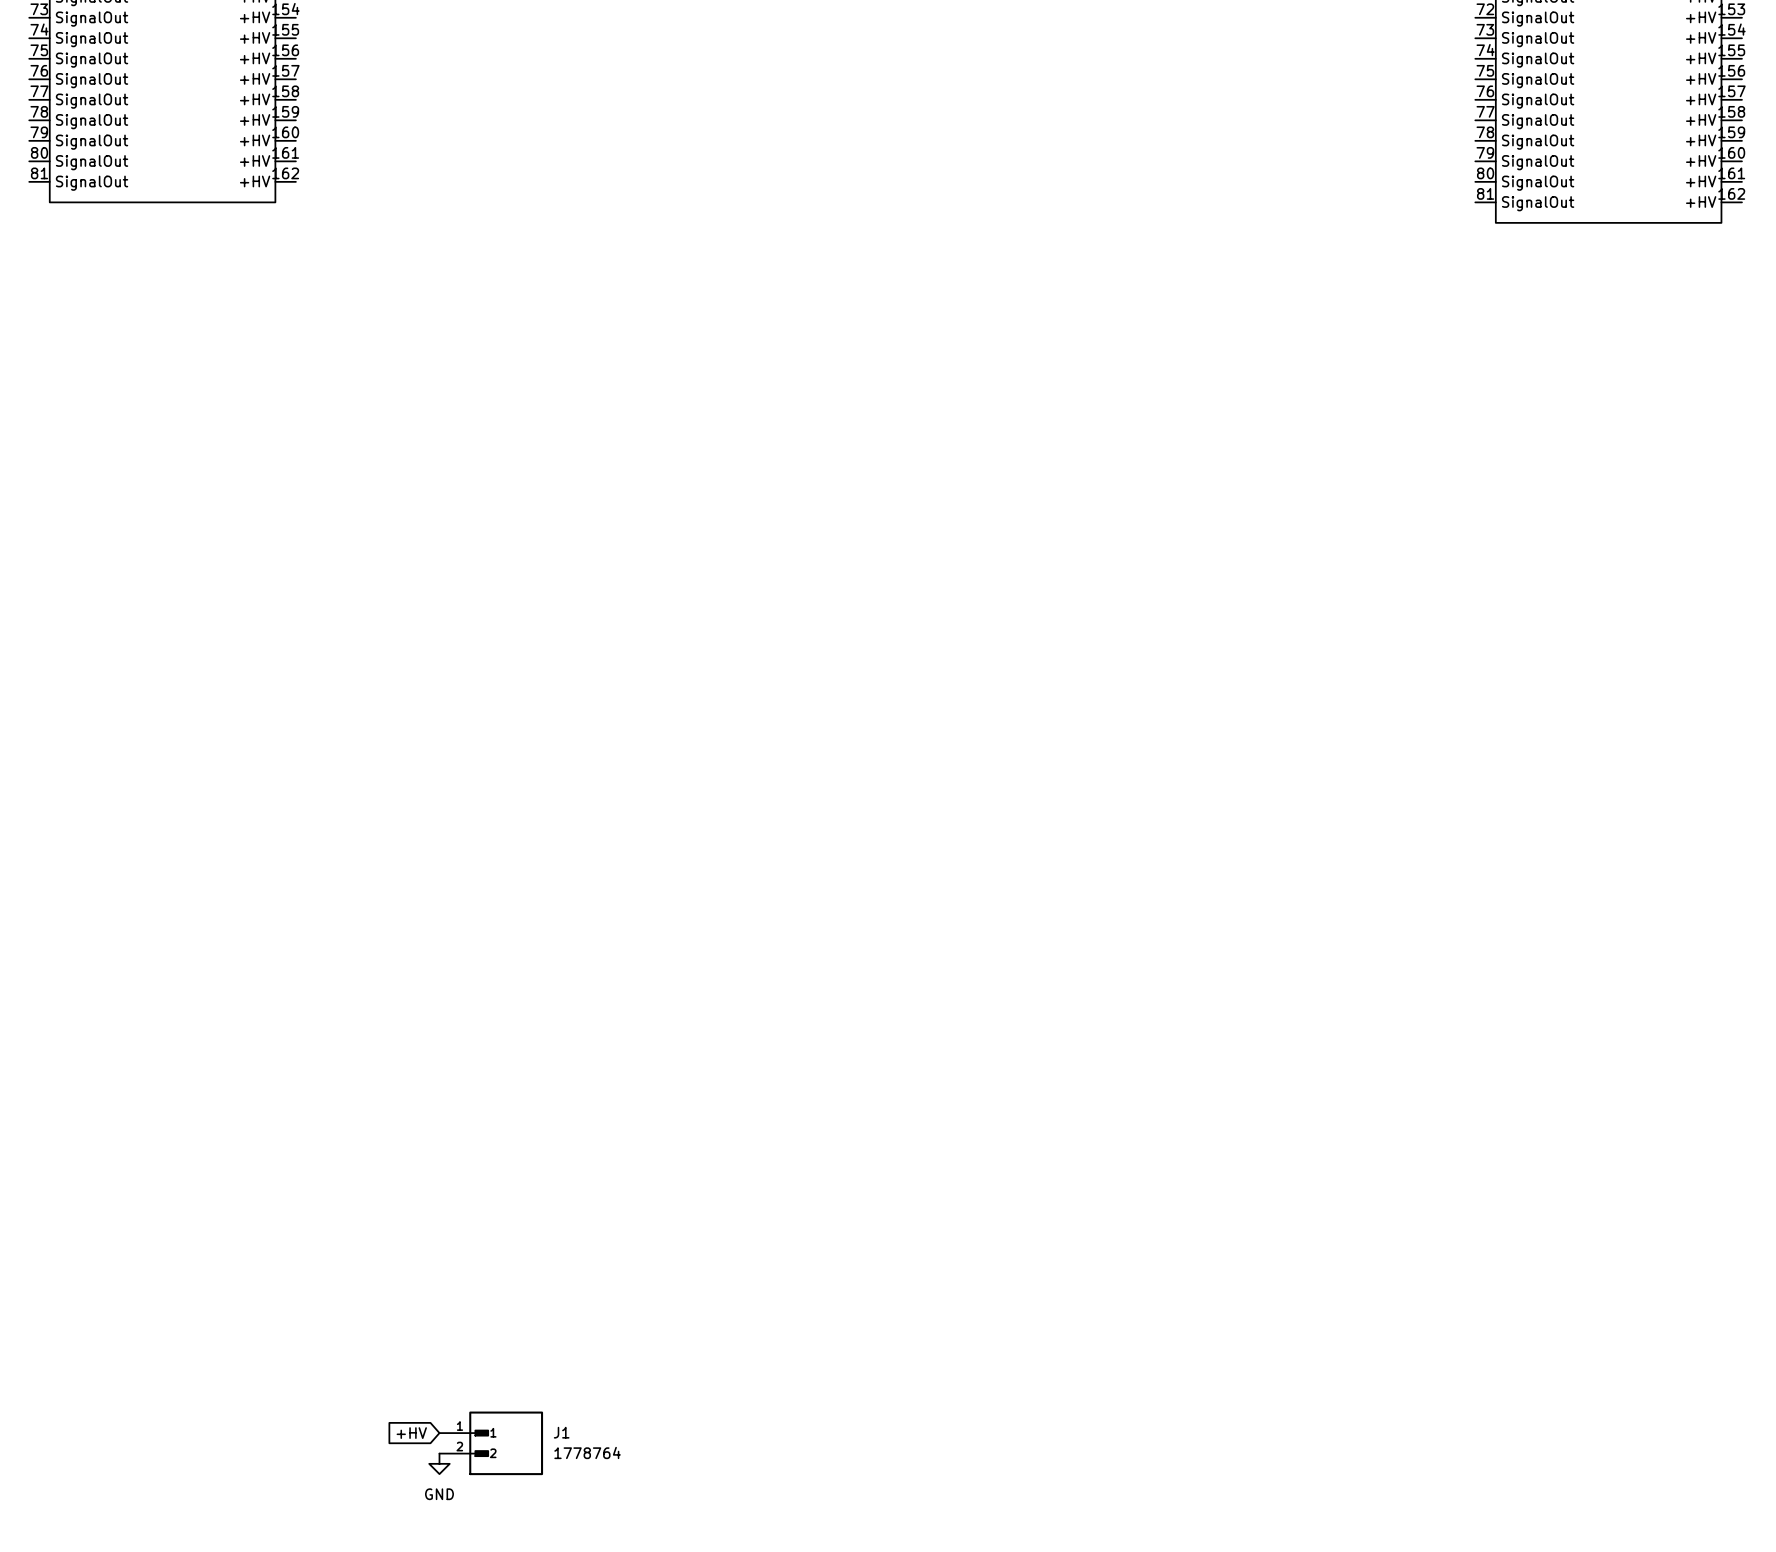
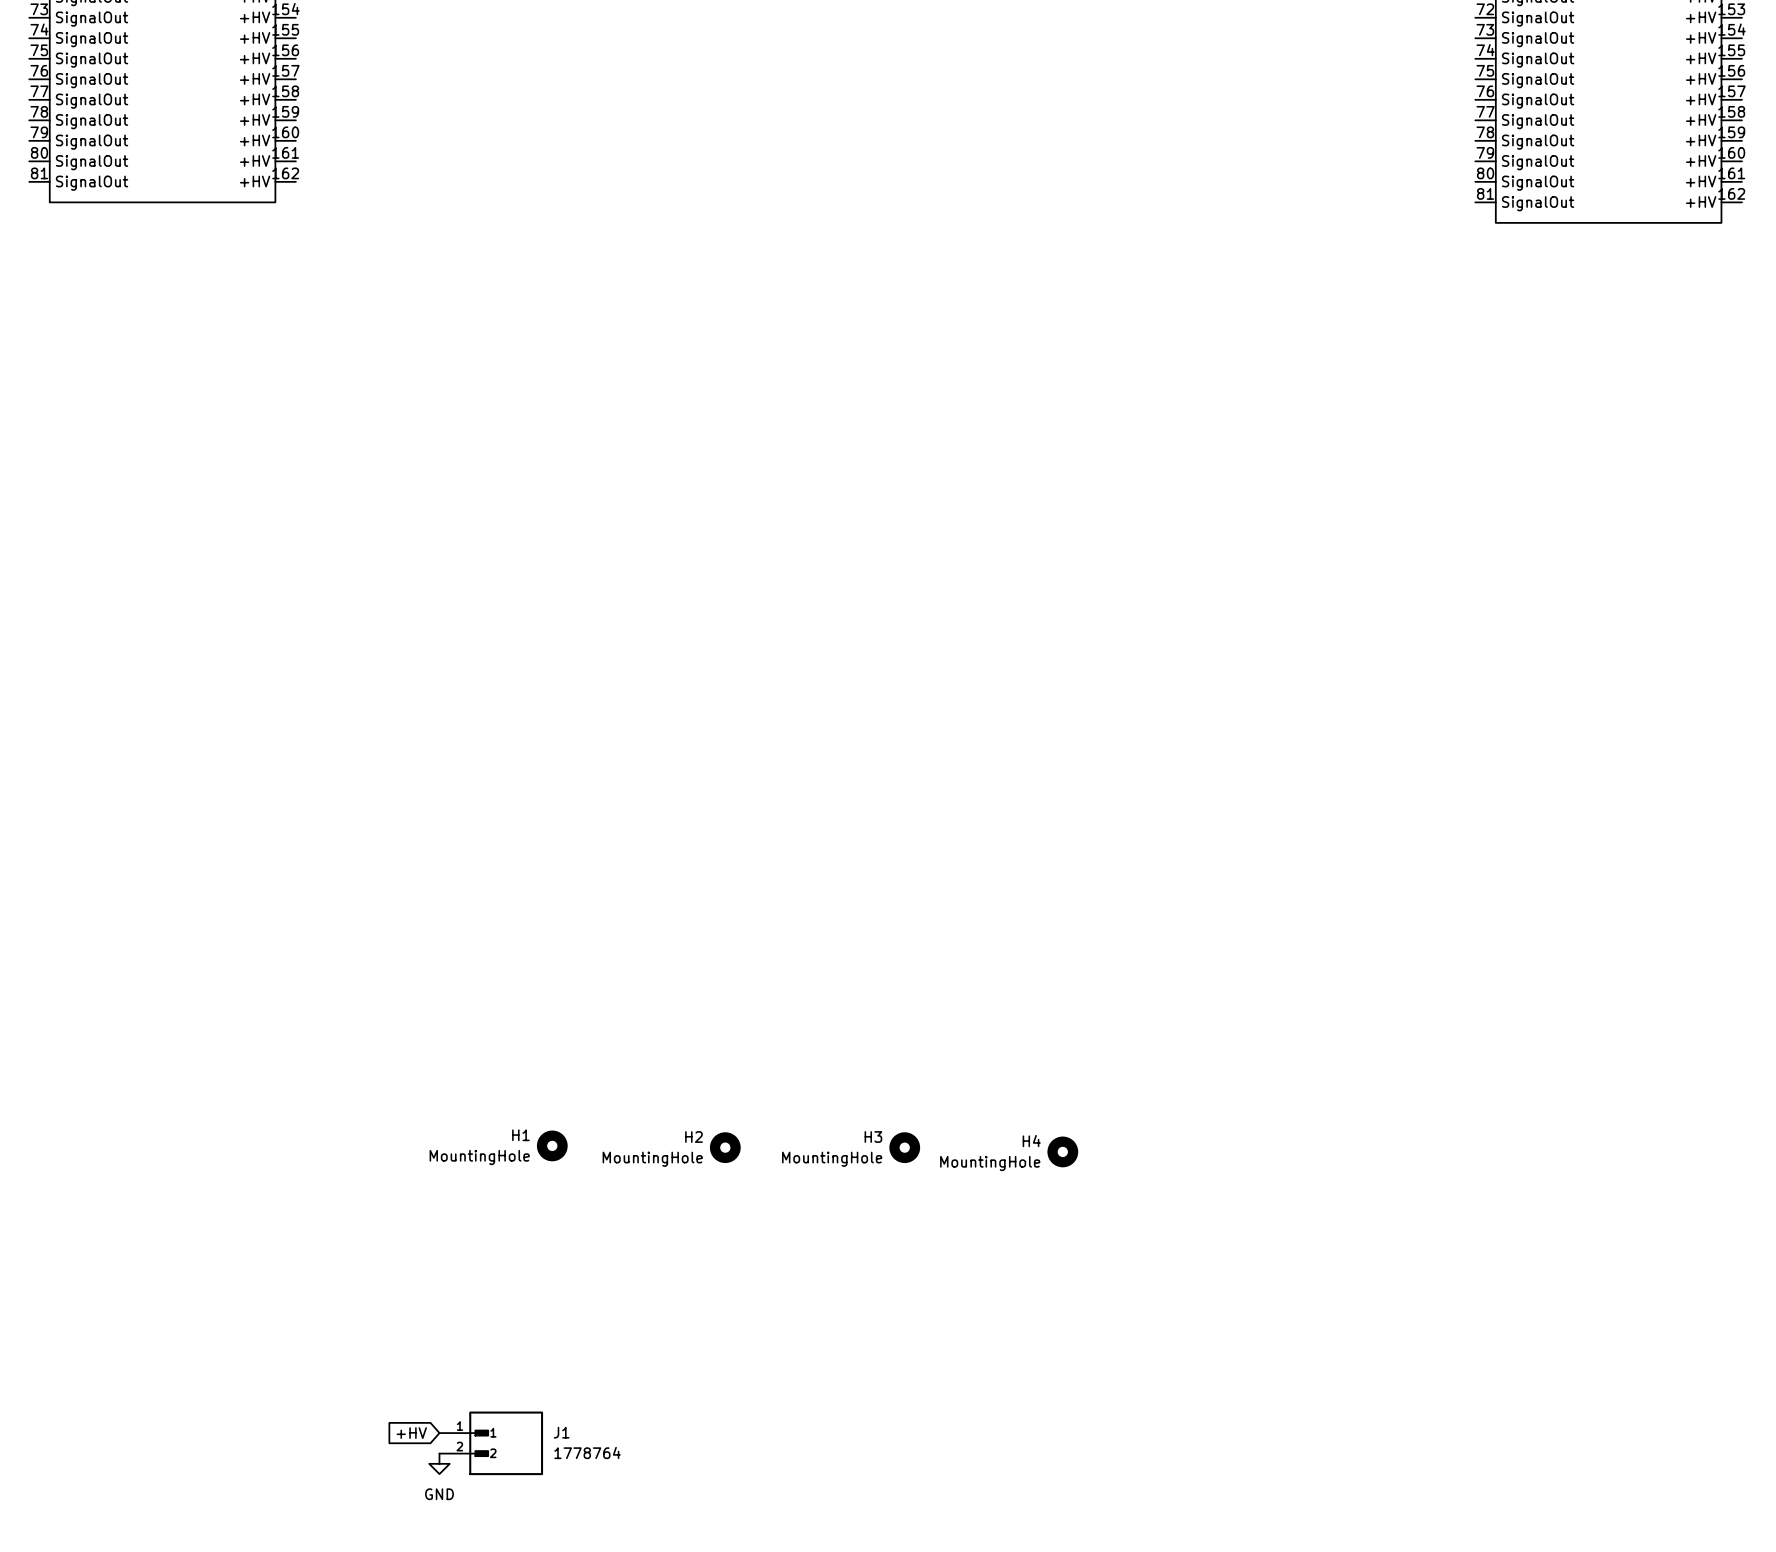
H1: none -> MountingHole (552, 1145)
H2: none -> MountingHole (725, 1147)
H3: none -> MountingHole (904, 1147)
H4: none -> MountingHole (1062, 1151)

